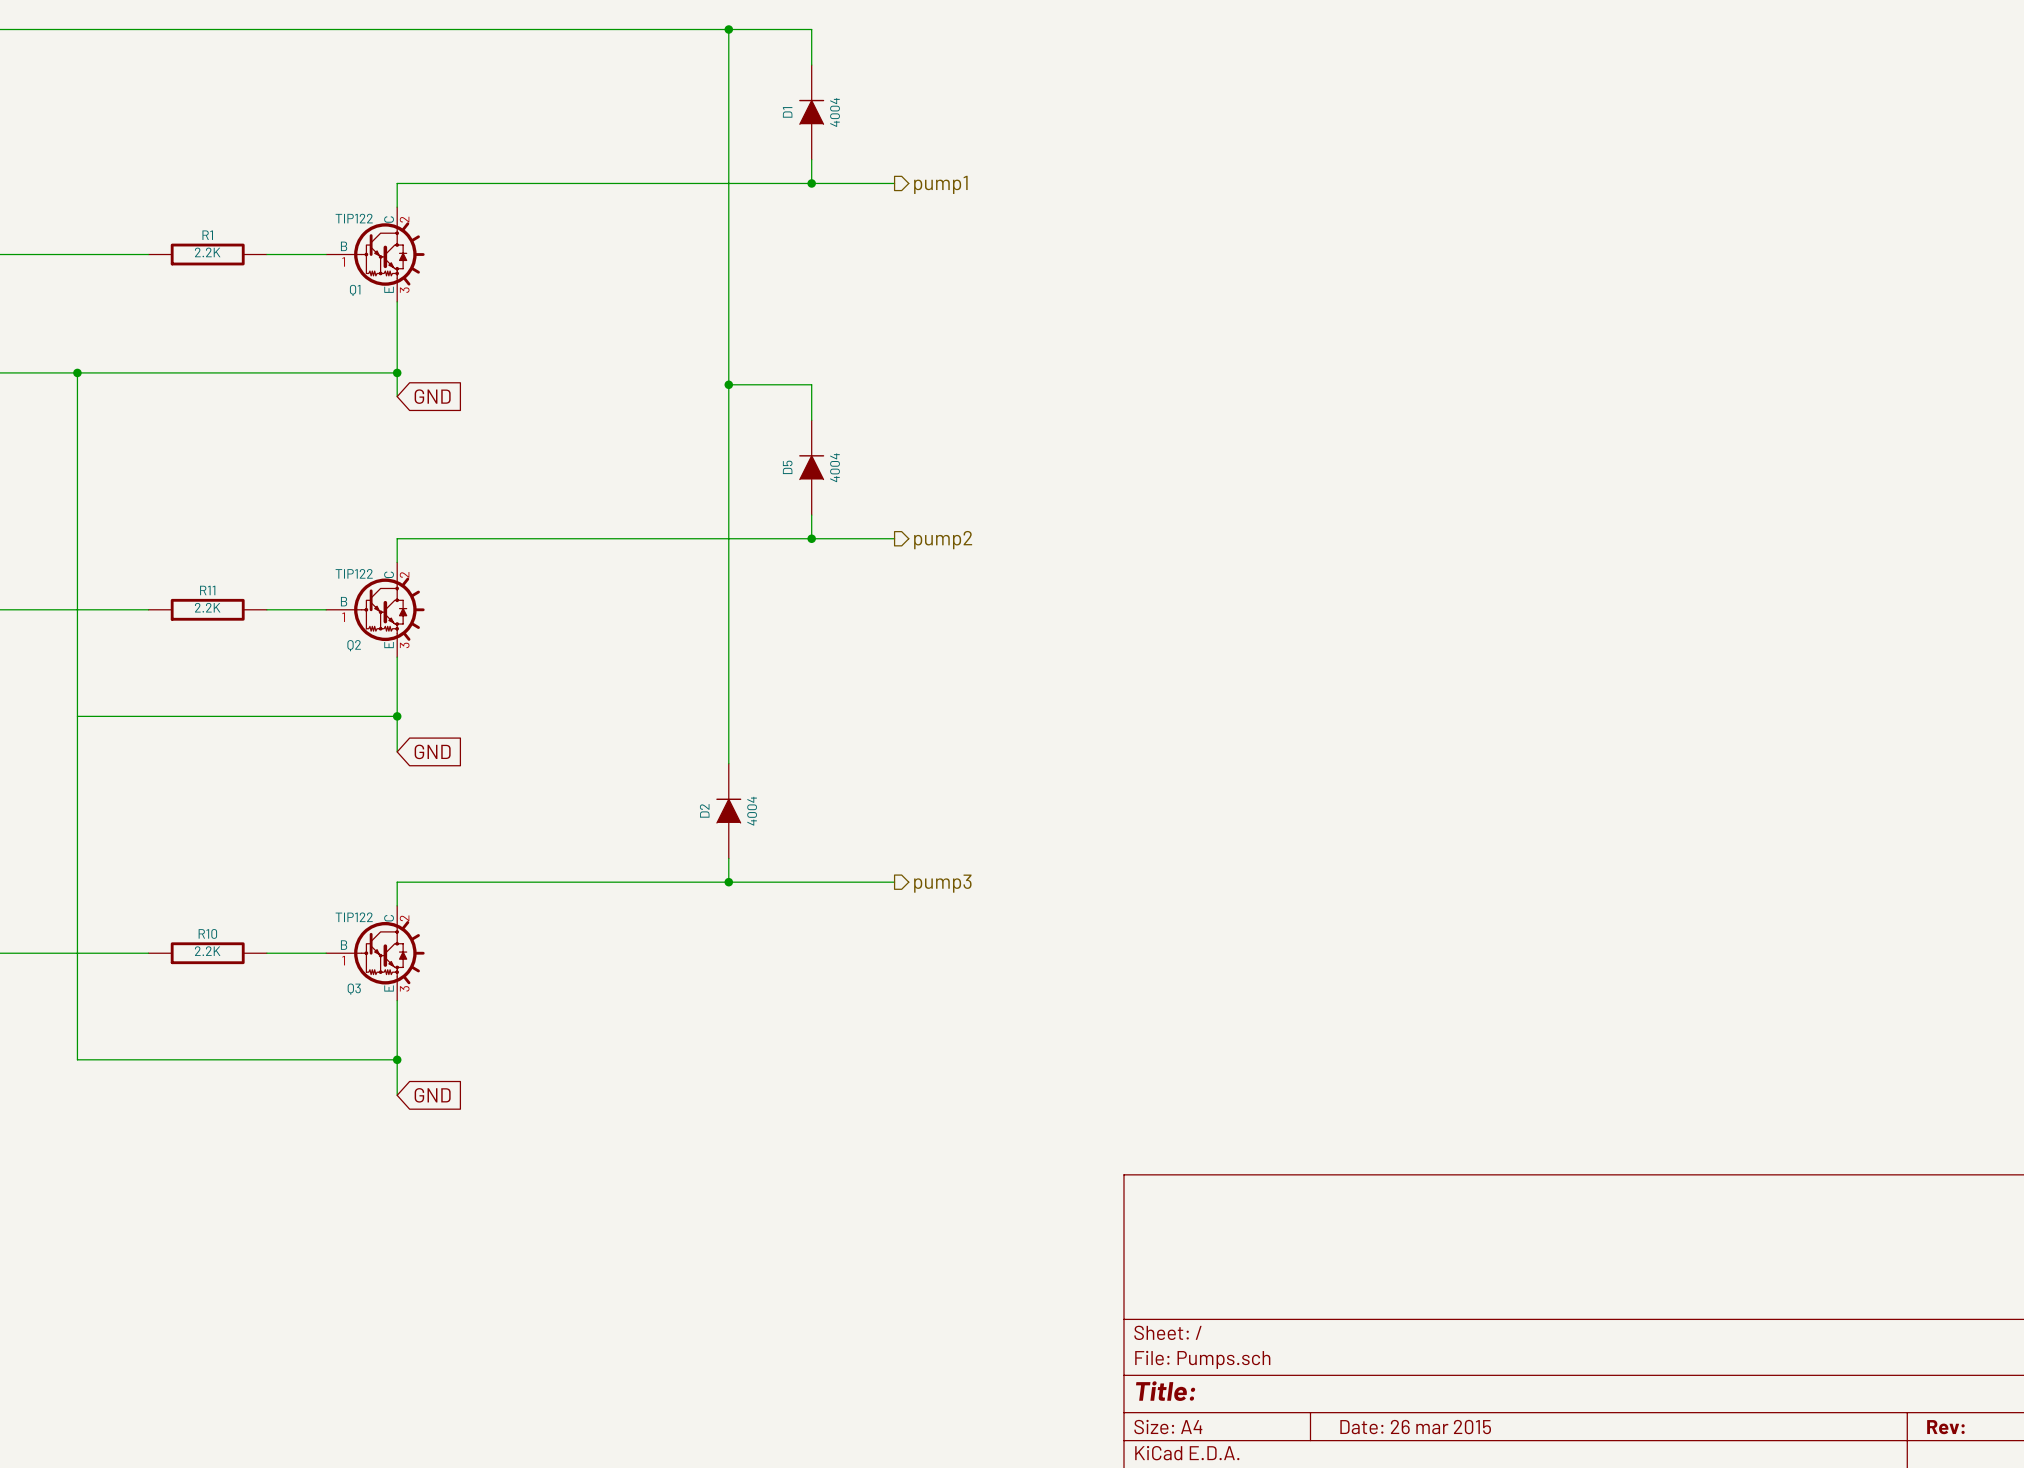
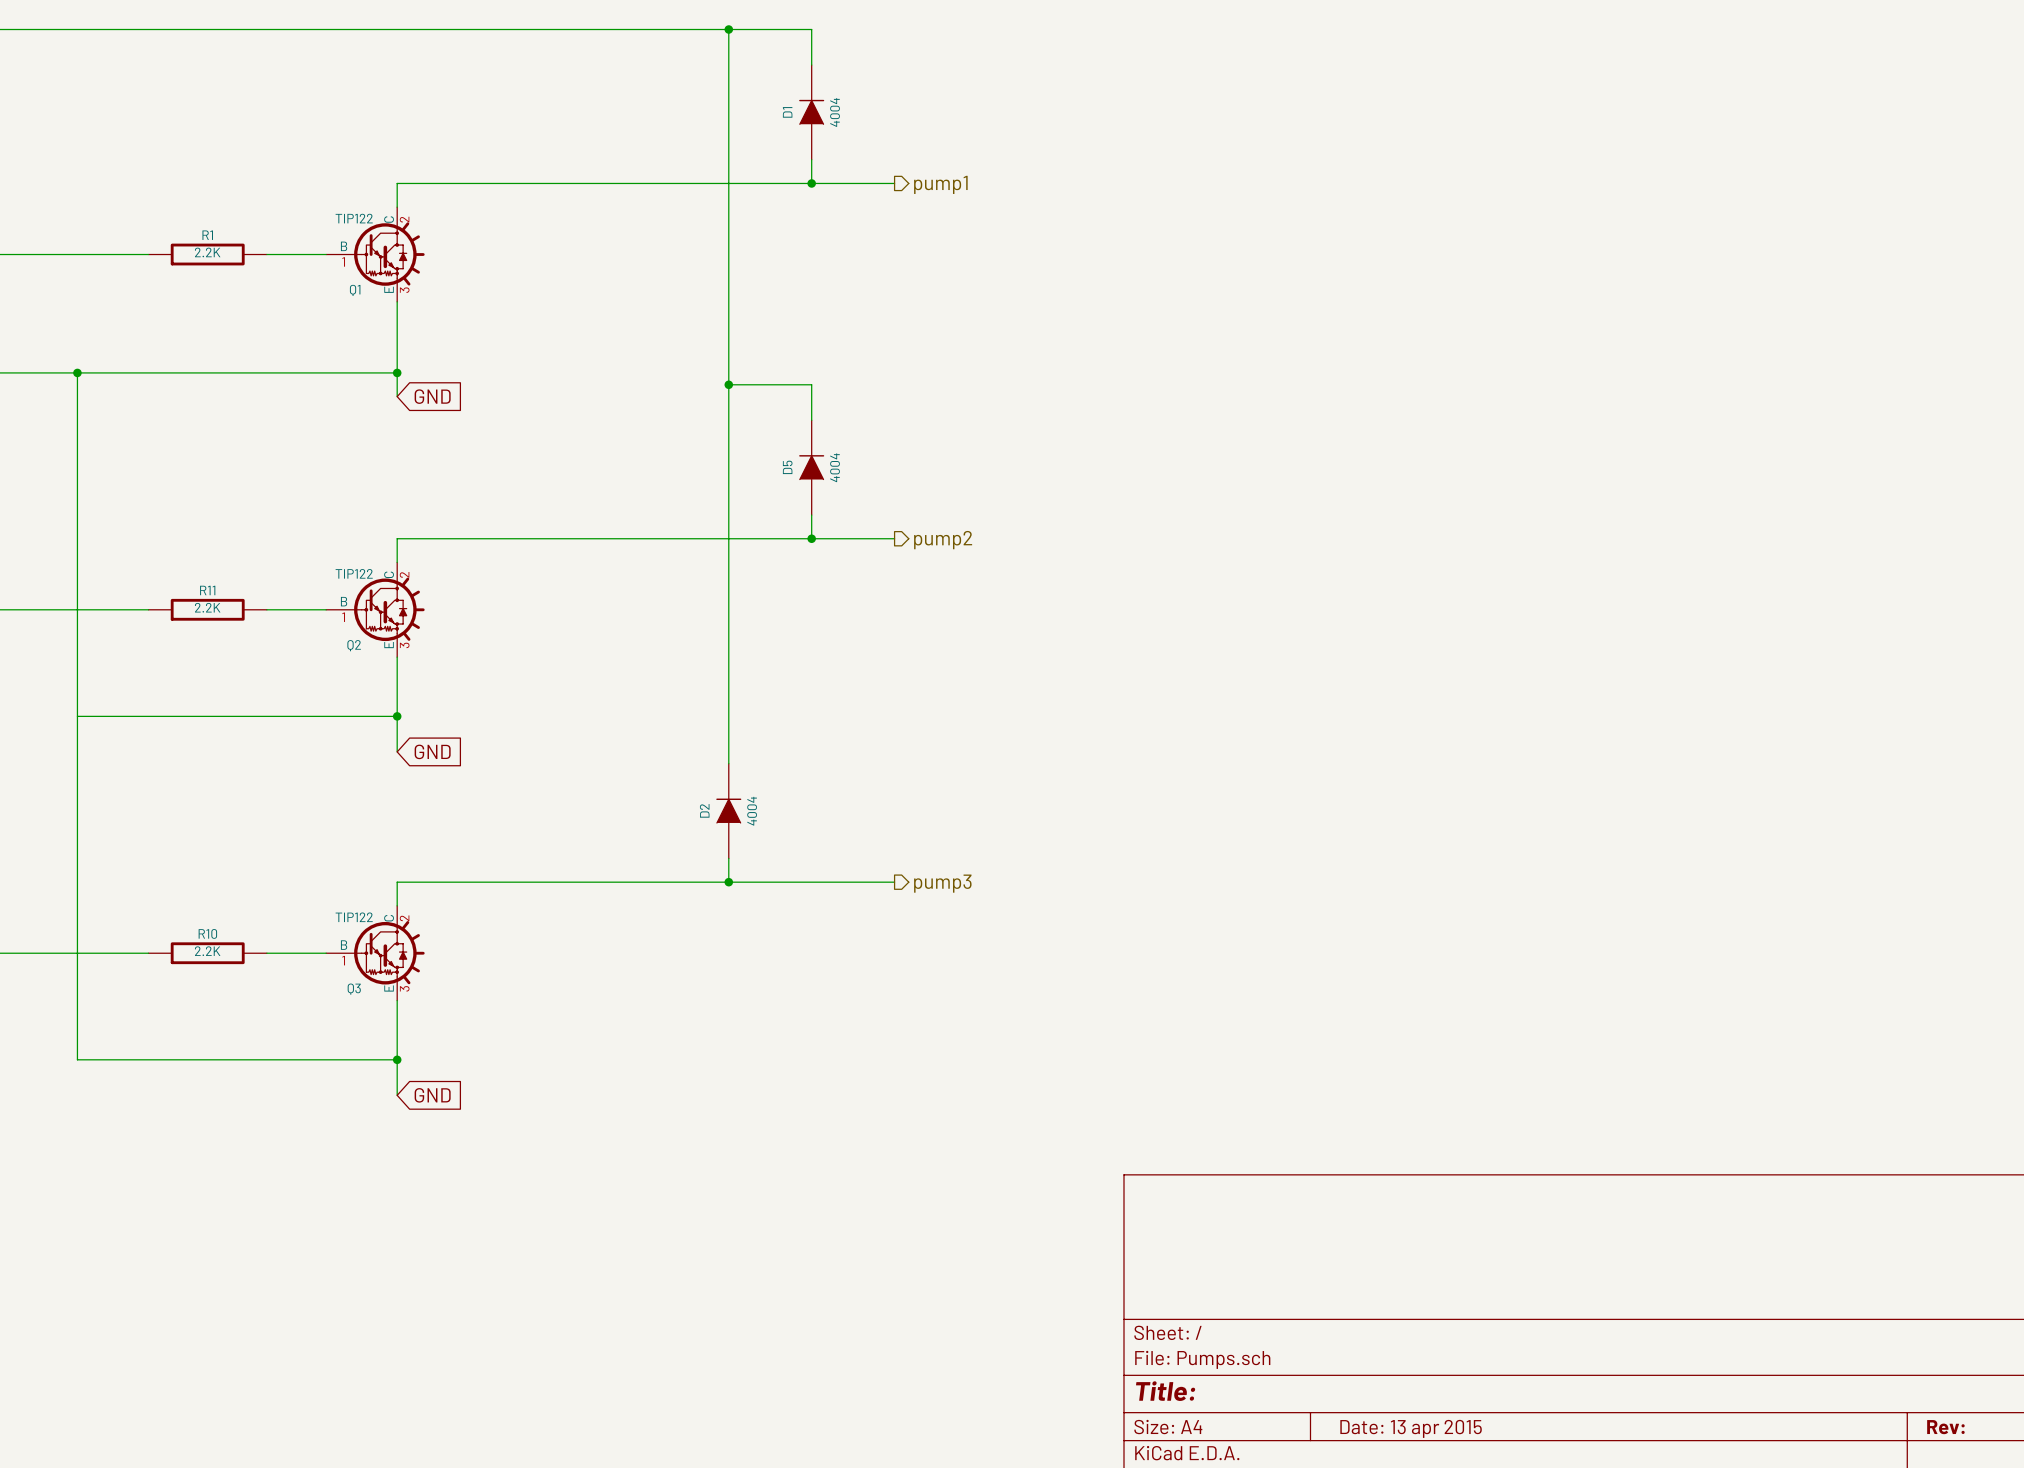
title block: Date: 26 mar 2015 (1415, 1427) -> Date: 13 apr 2015 (1411, 1428)

